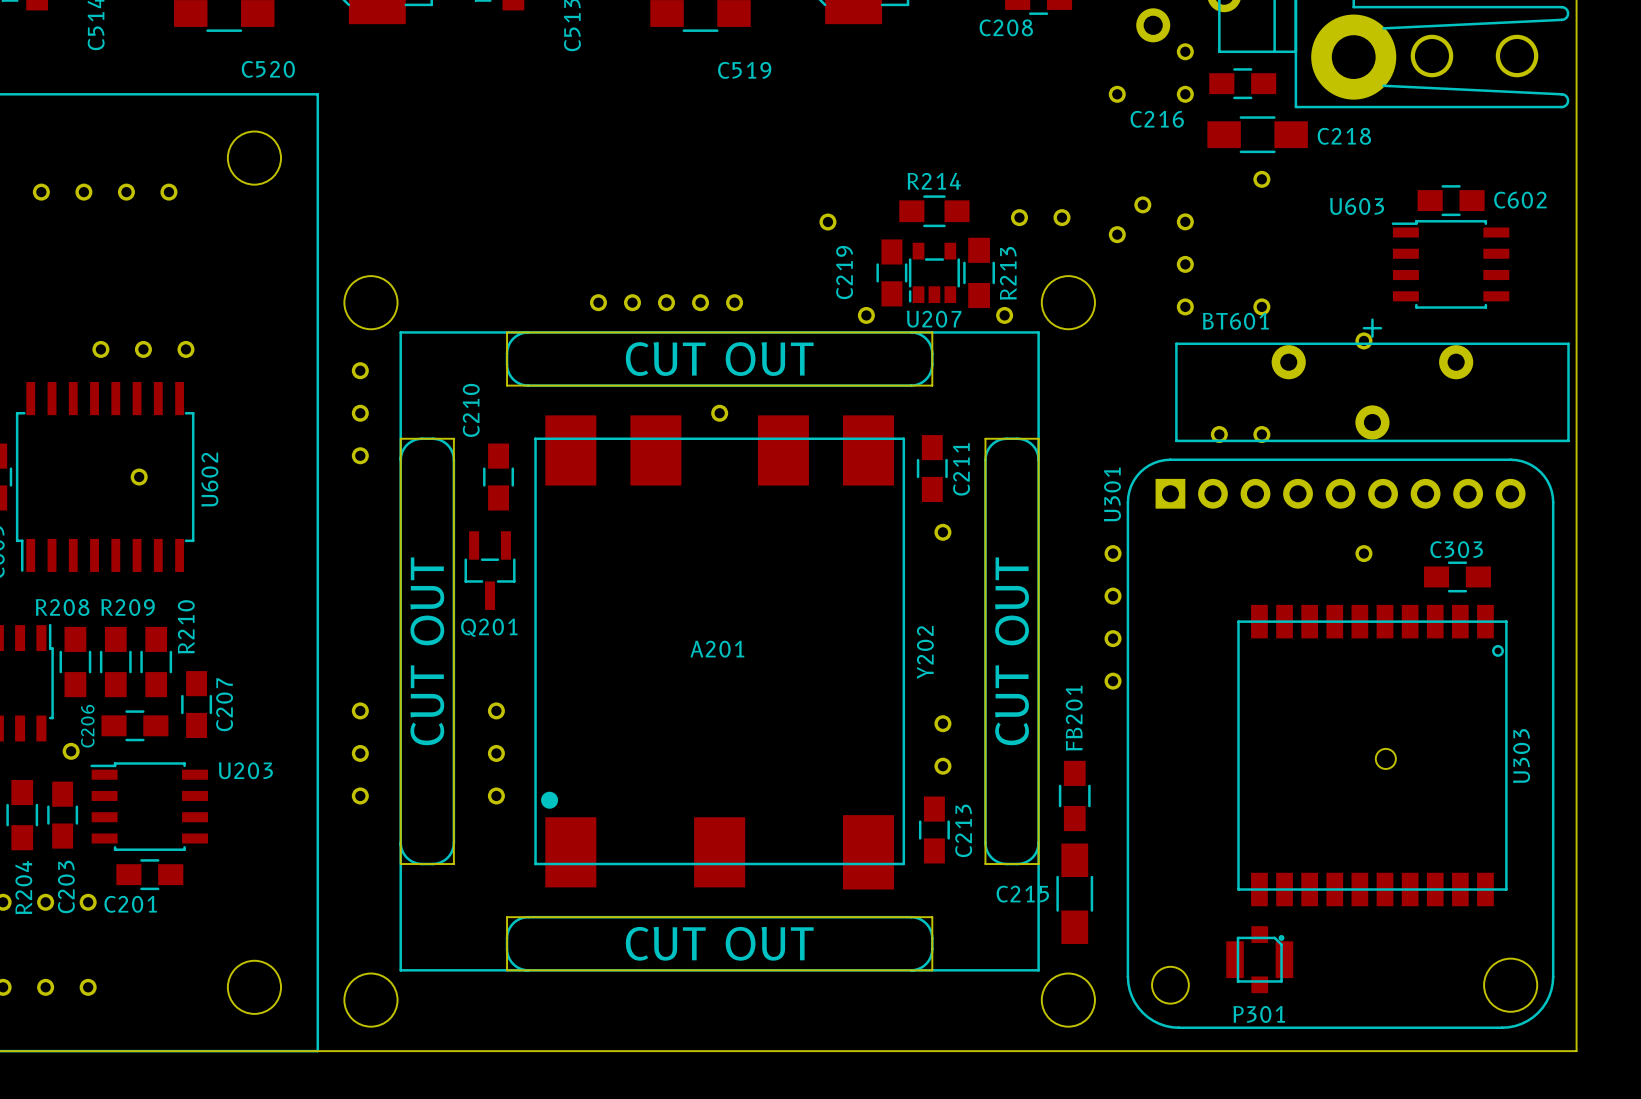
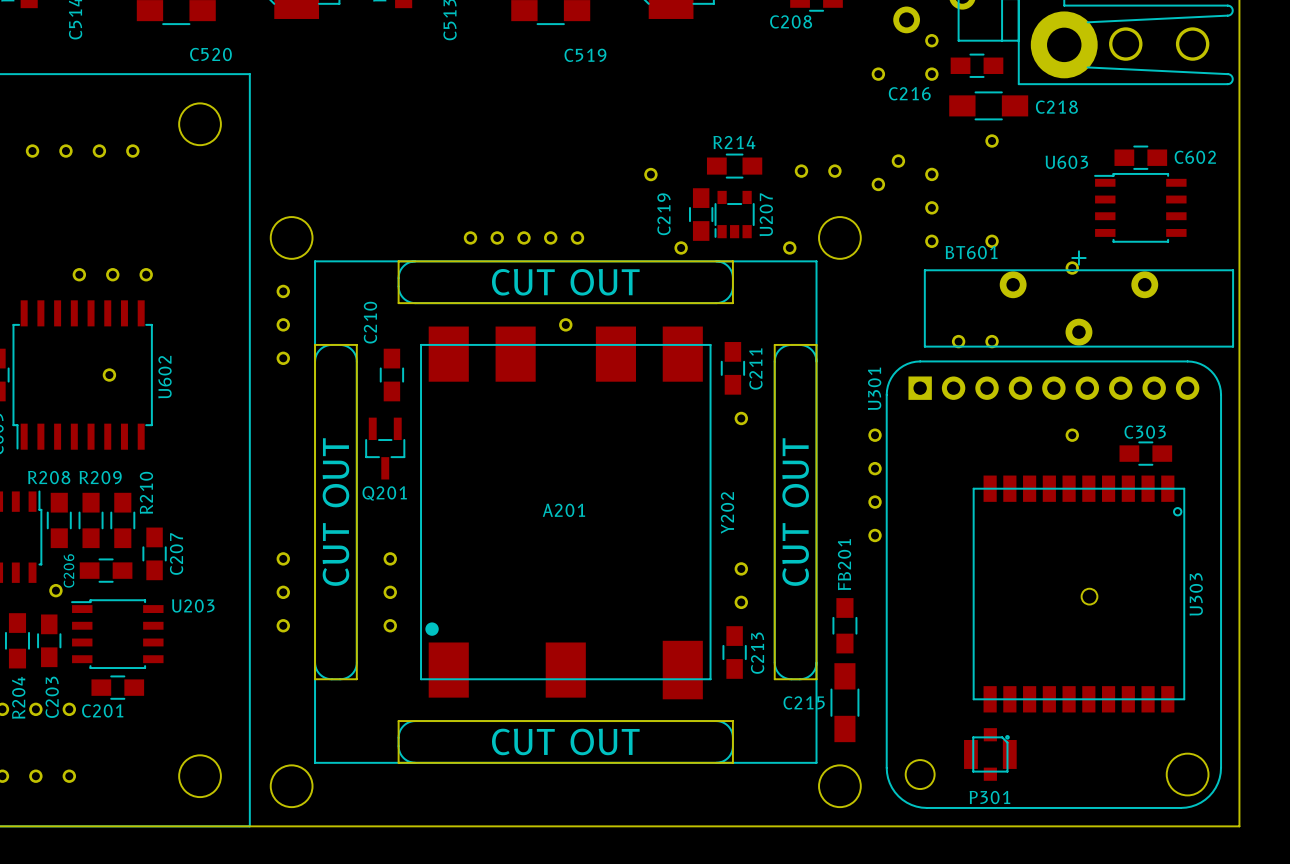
R213: (979, 272) -> none
U207 name rotation: 0° (934, 319) -> 90° counterclockwise (766, 214)

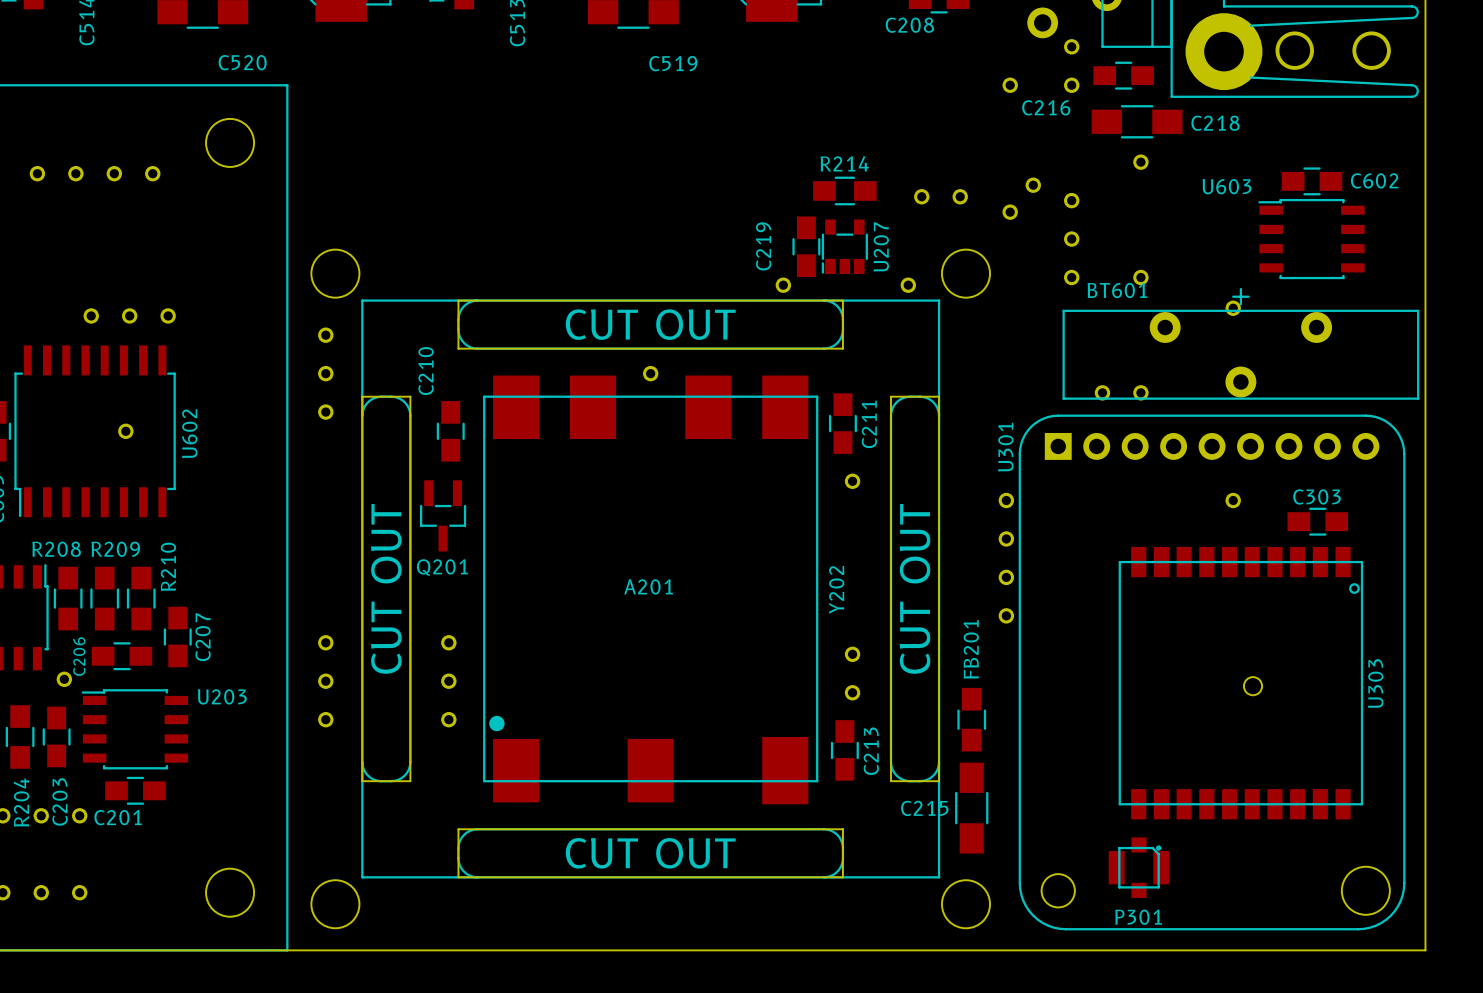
part: (650, 174) -> none
part: (470, 237) -> none
part: (497, 237) -> none
part: (523, 237) -> none
part: (550, 237) -> none
part: (577, 237) -> none

